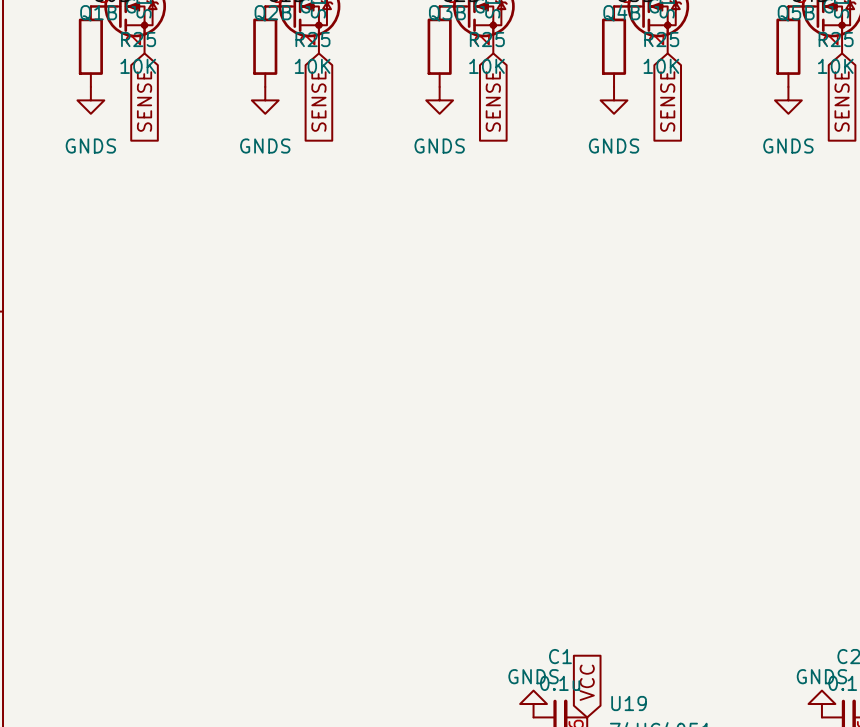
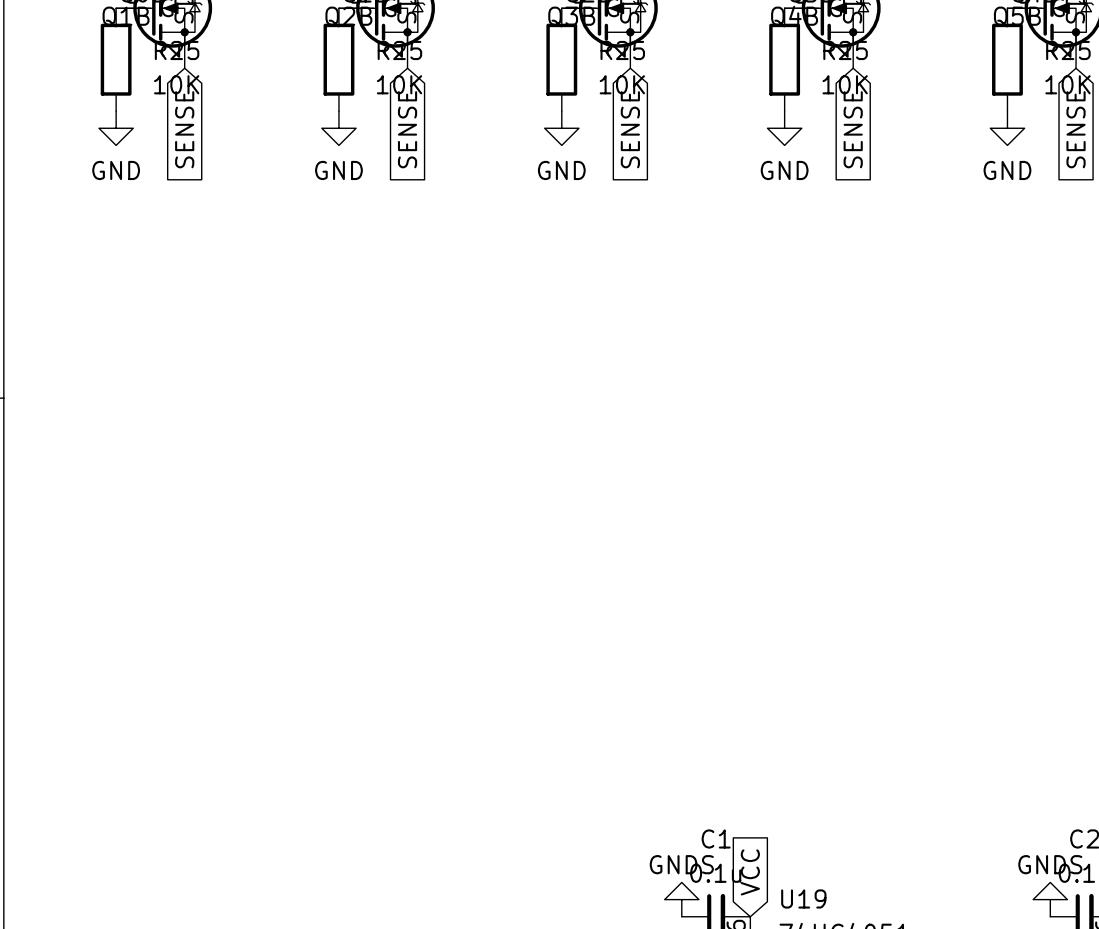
power symbol: GNDS (90, 100) -> GND (116, 128)
power symbol: GNDS (265, 100) -> GND (338, 128)
power symbol: GNDS (439, 100) -> GND (561, 128)
power symbol: GNDS (614, 100) -> GND (784, 128)
power symbol: GNDS (788, 100) -> GND (1007, 128)

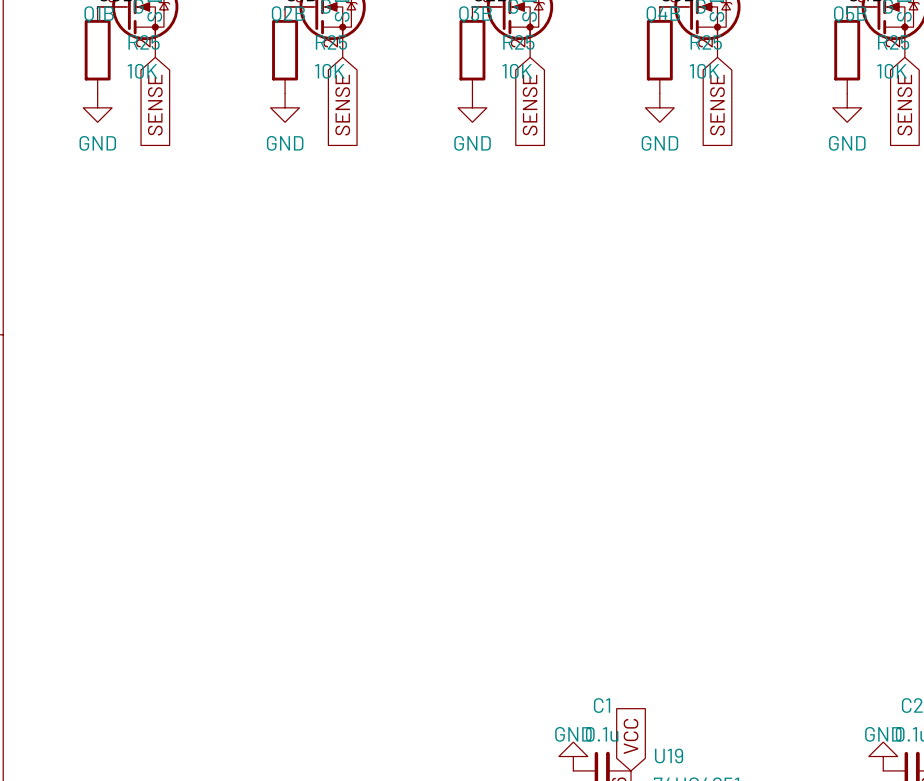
power symbol: GNDS (681, 899) -> GND (573, 756)
power symbol: GNDS (1050, 899) -> GND (883, 756)

